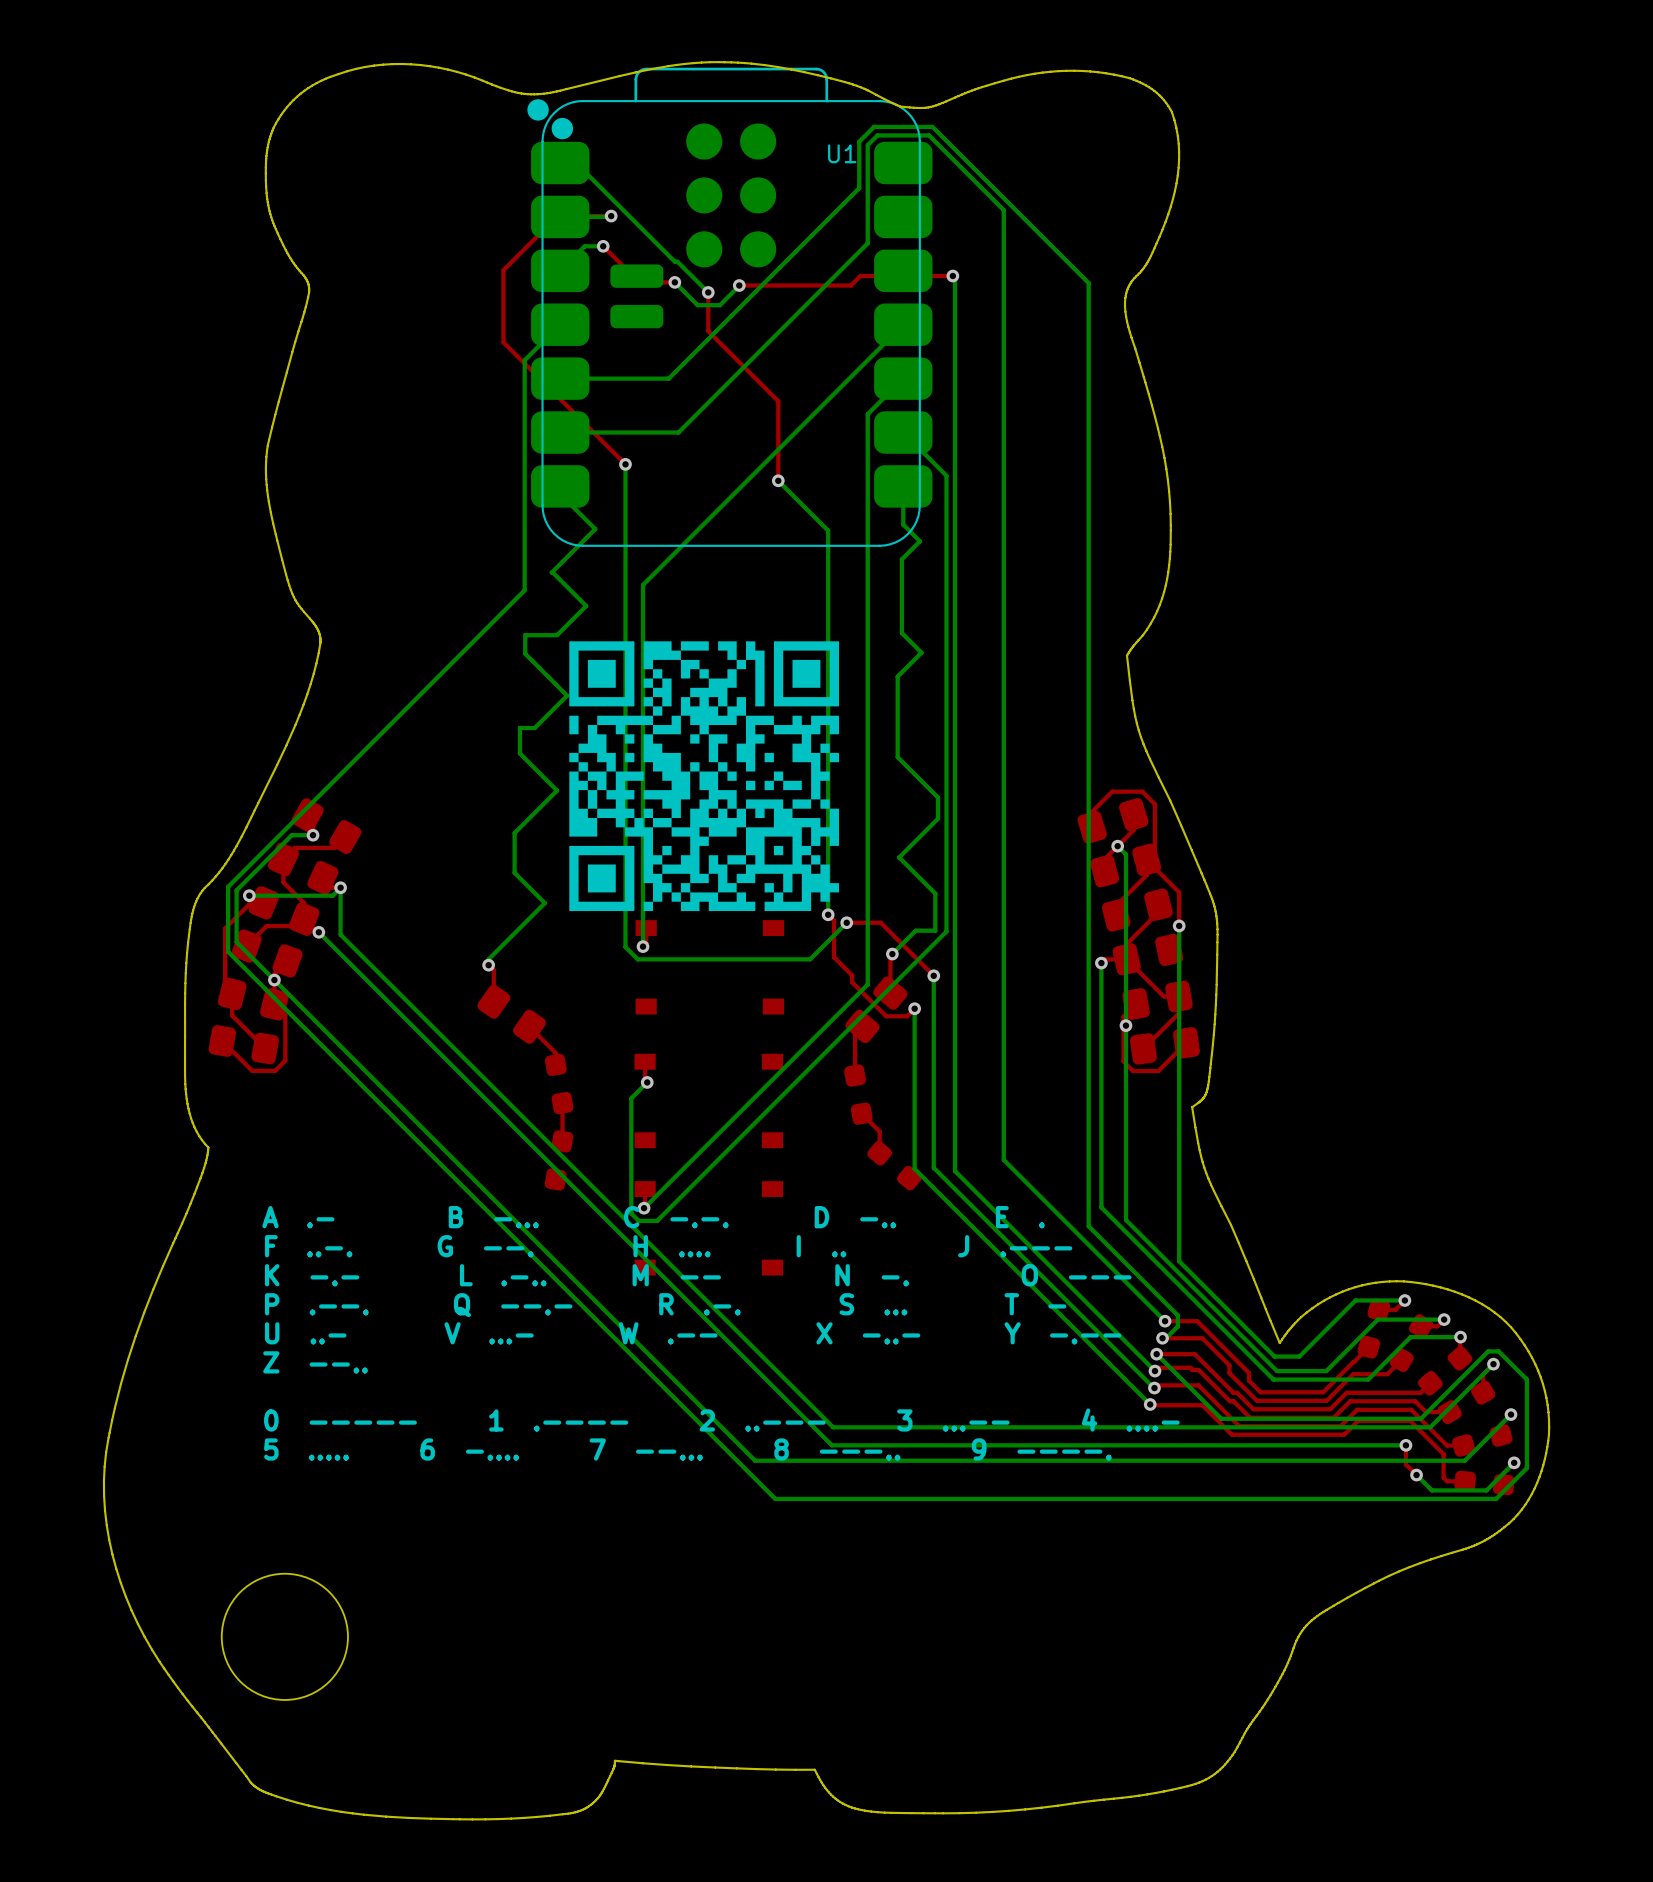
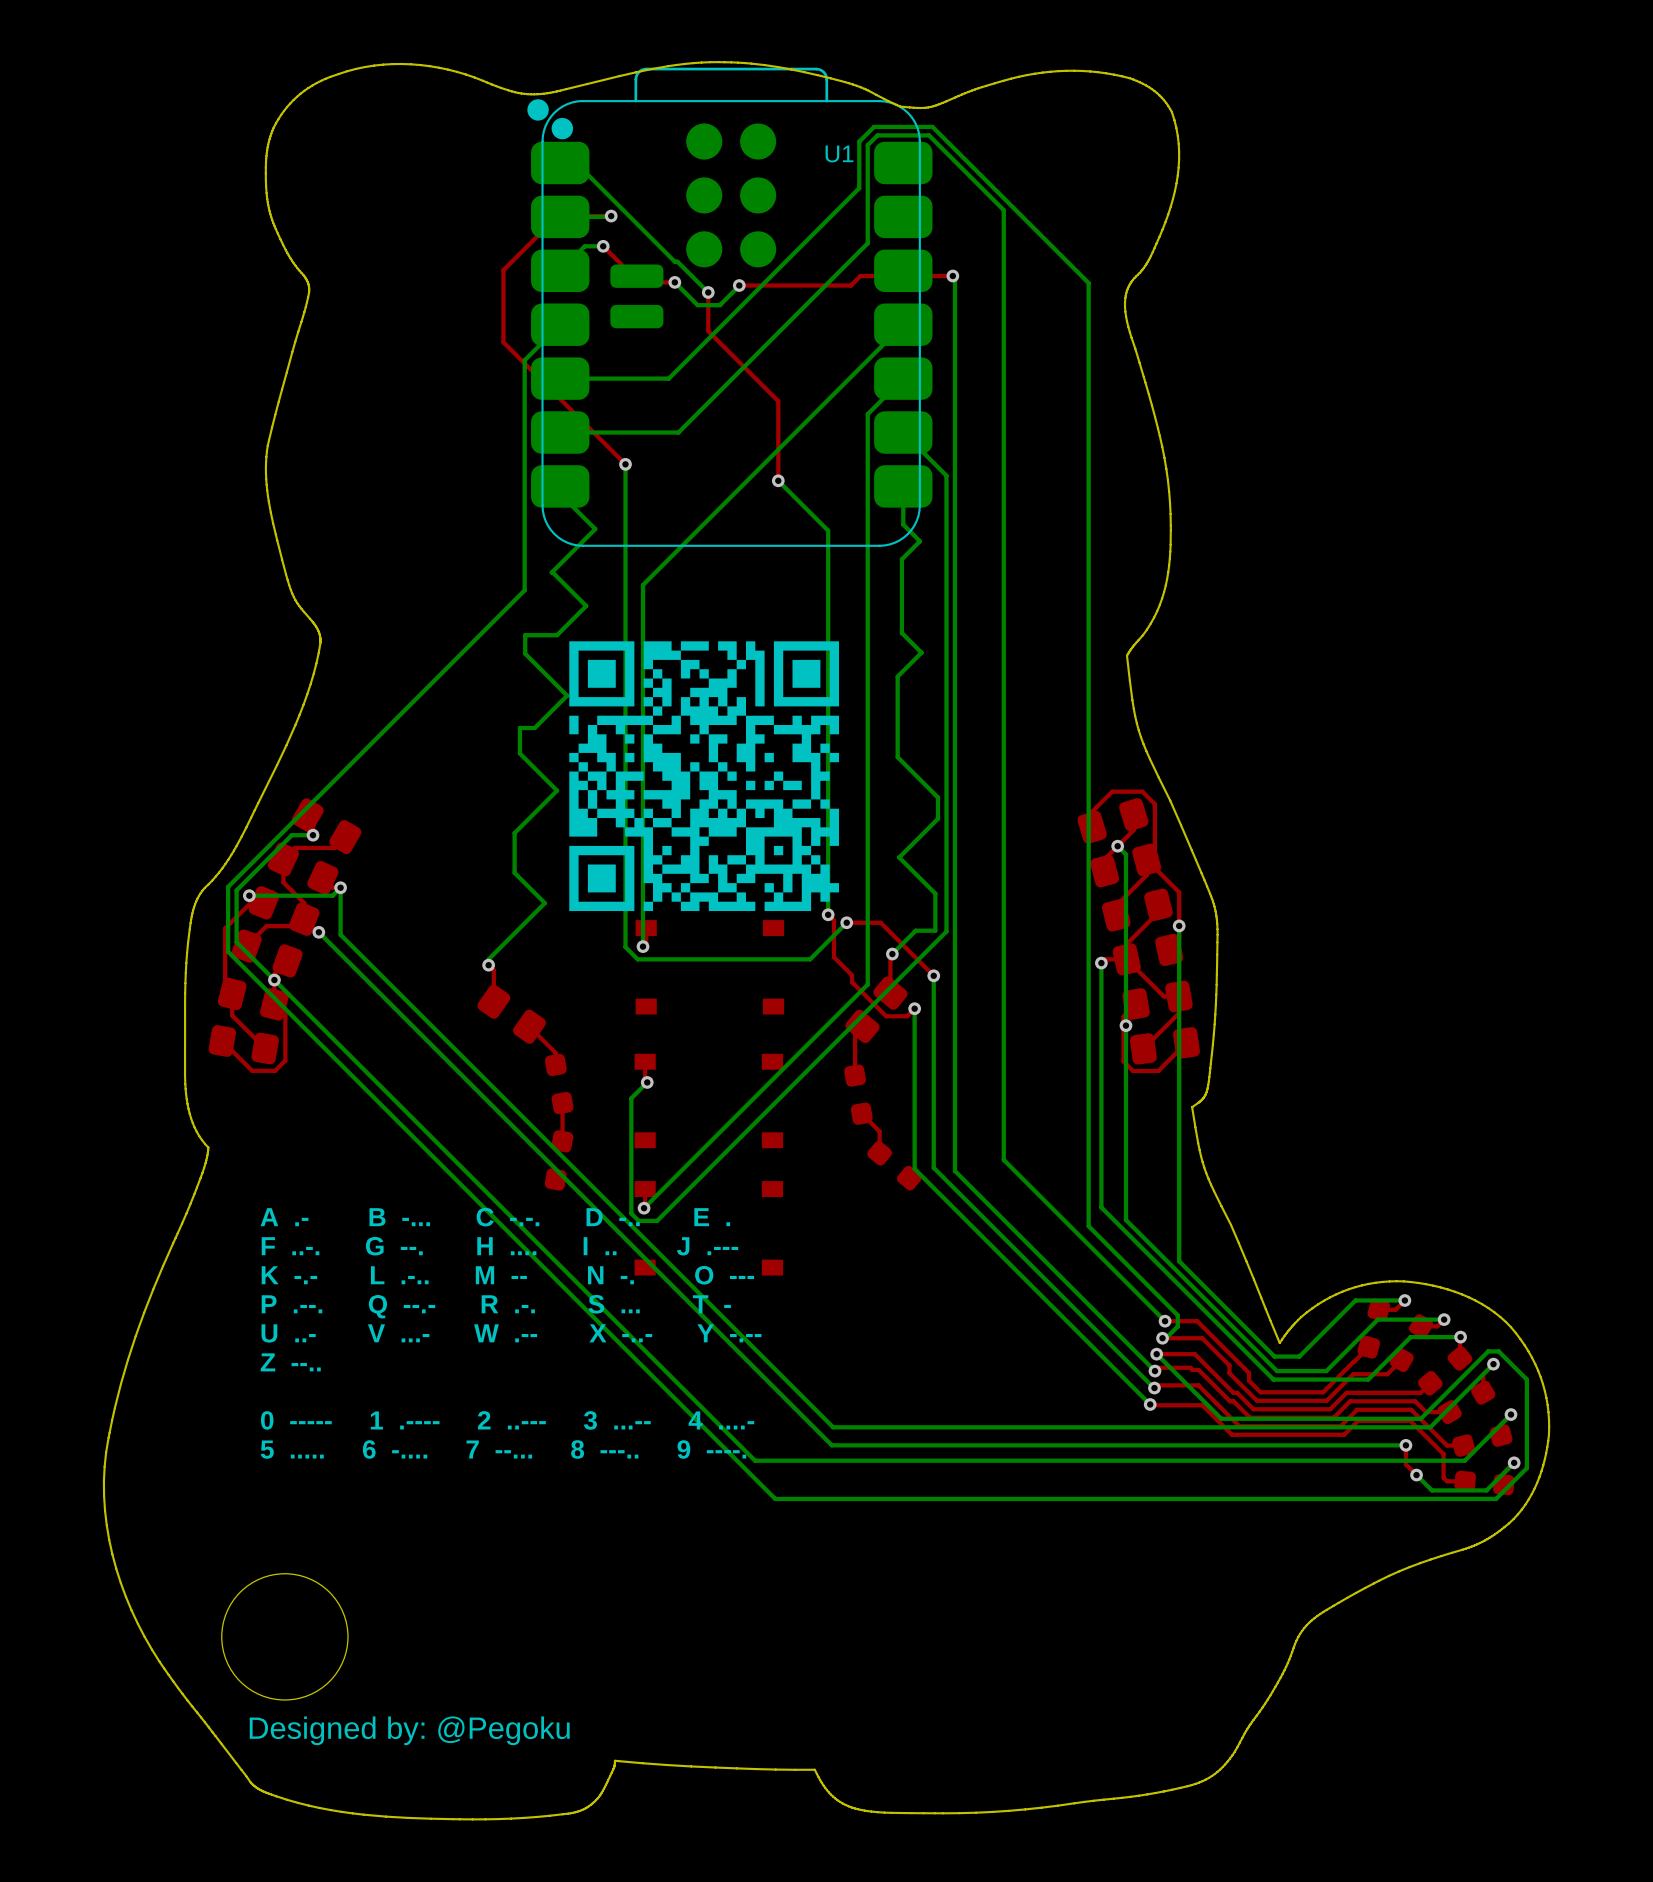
text: none -> Designed by: @Pegoku (409, 1730)

